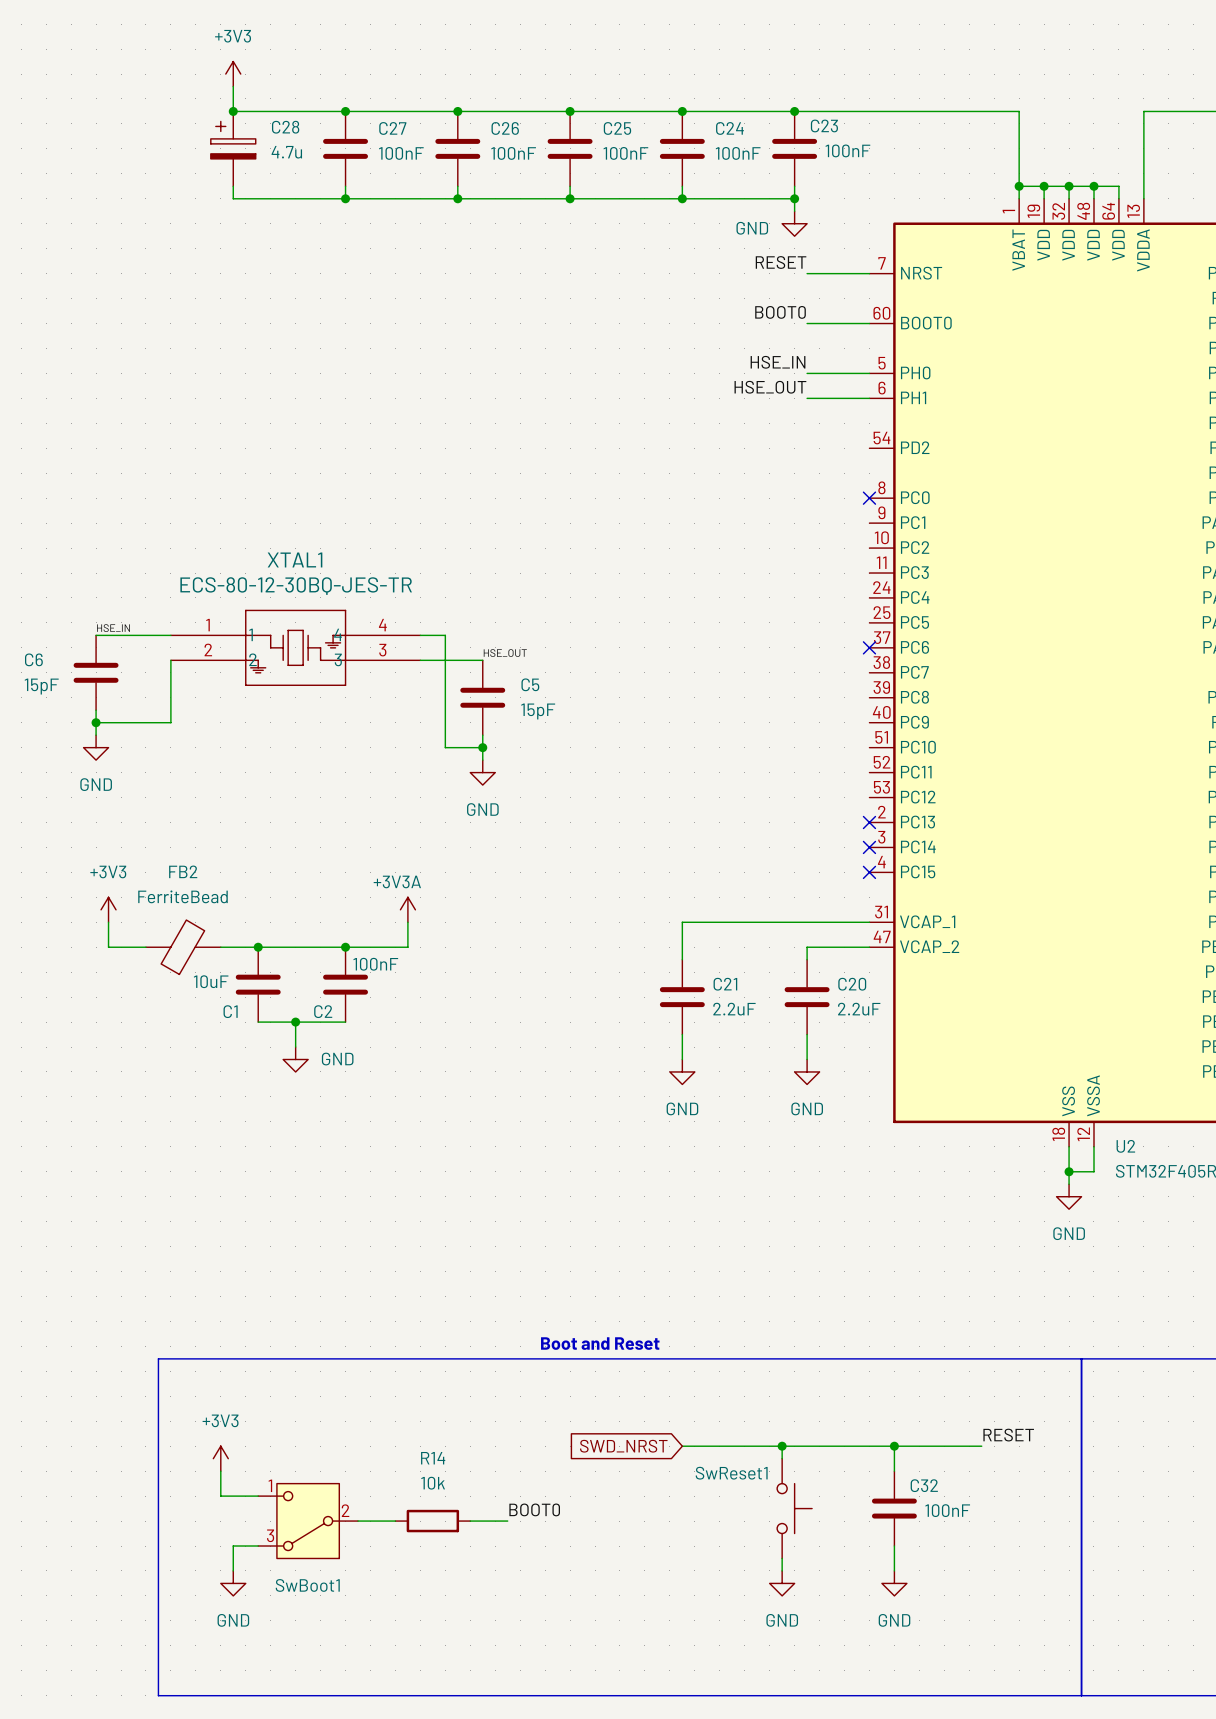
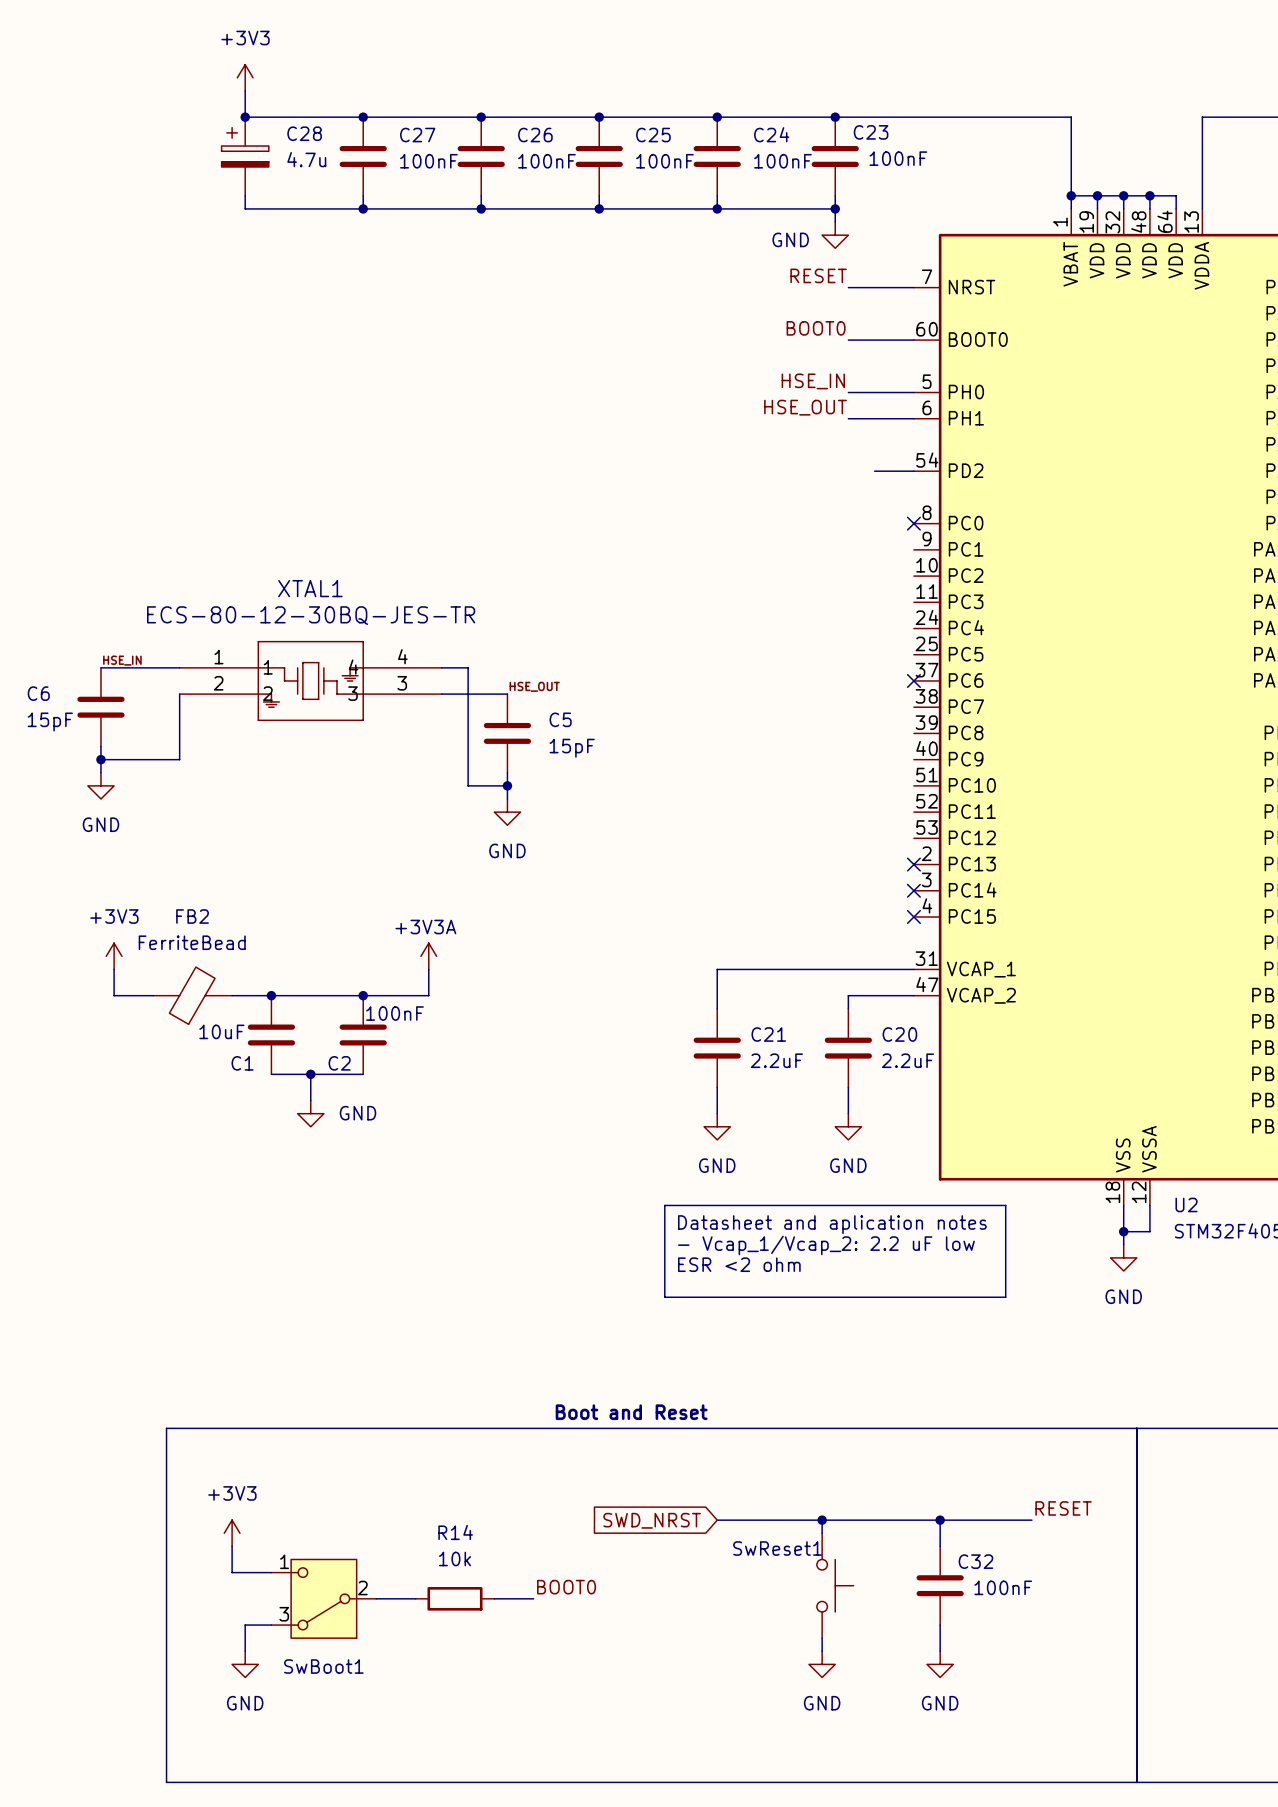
wire: none -> (874, 471) (913, 471)
line: none -> (664, 1205) (1005, 1205) (1005, 1297) (664, 1297) (664, 1205)
text: none -> Datasheet and aplication notes (832, 1224)
text: none -> - Vcap_1/Vcap_2: 2.2 uF low (826, 1245)
text: none -> ESR <2 ohm (739, 1264)

